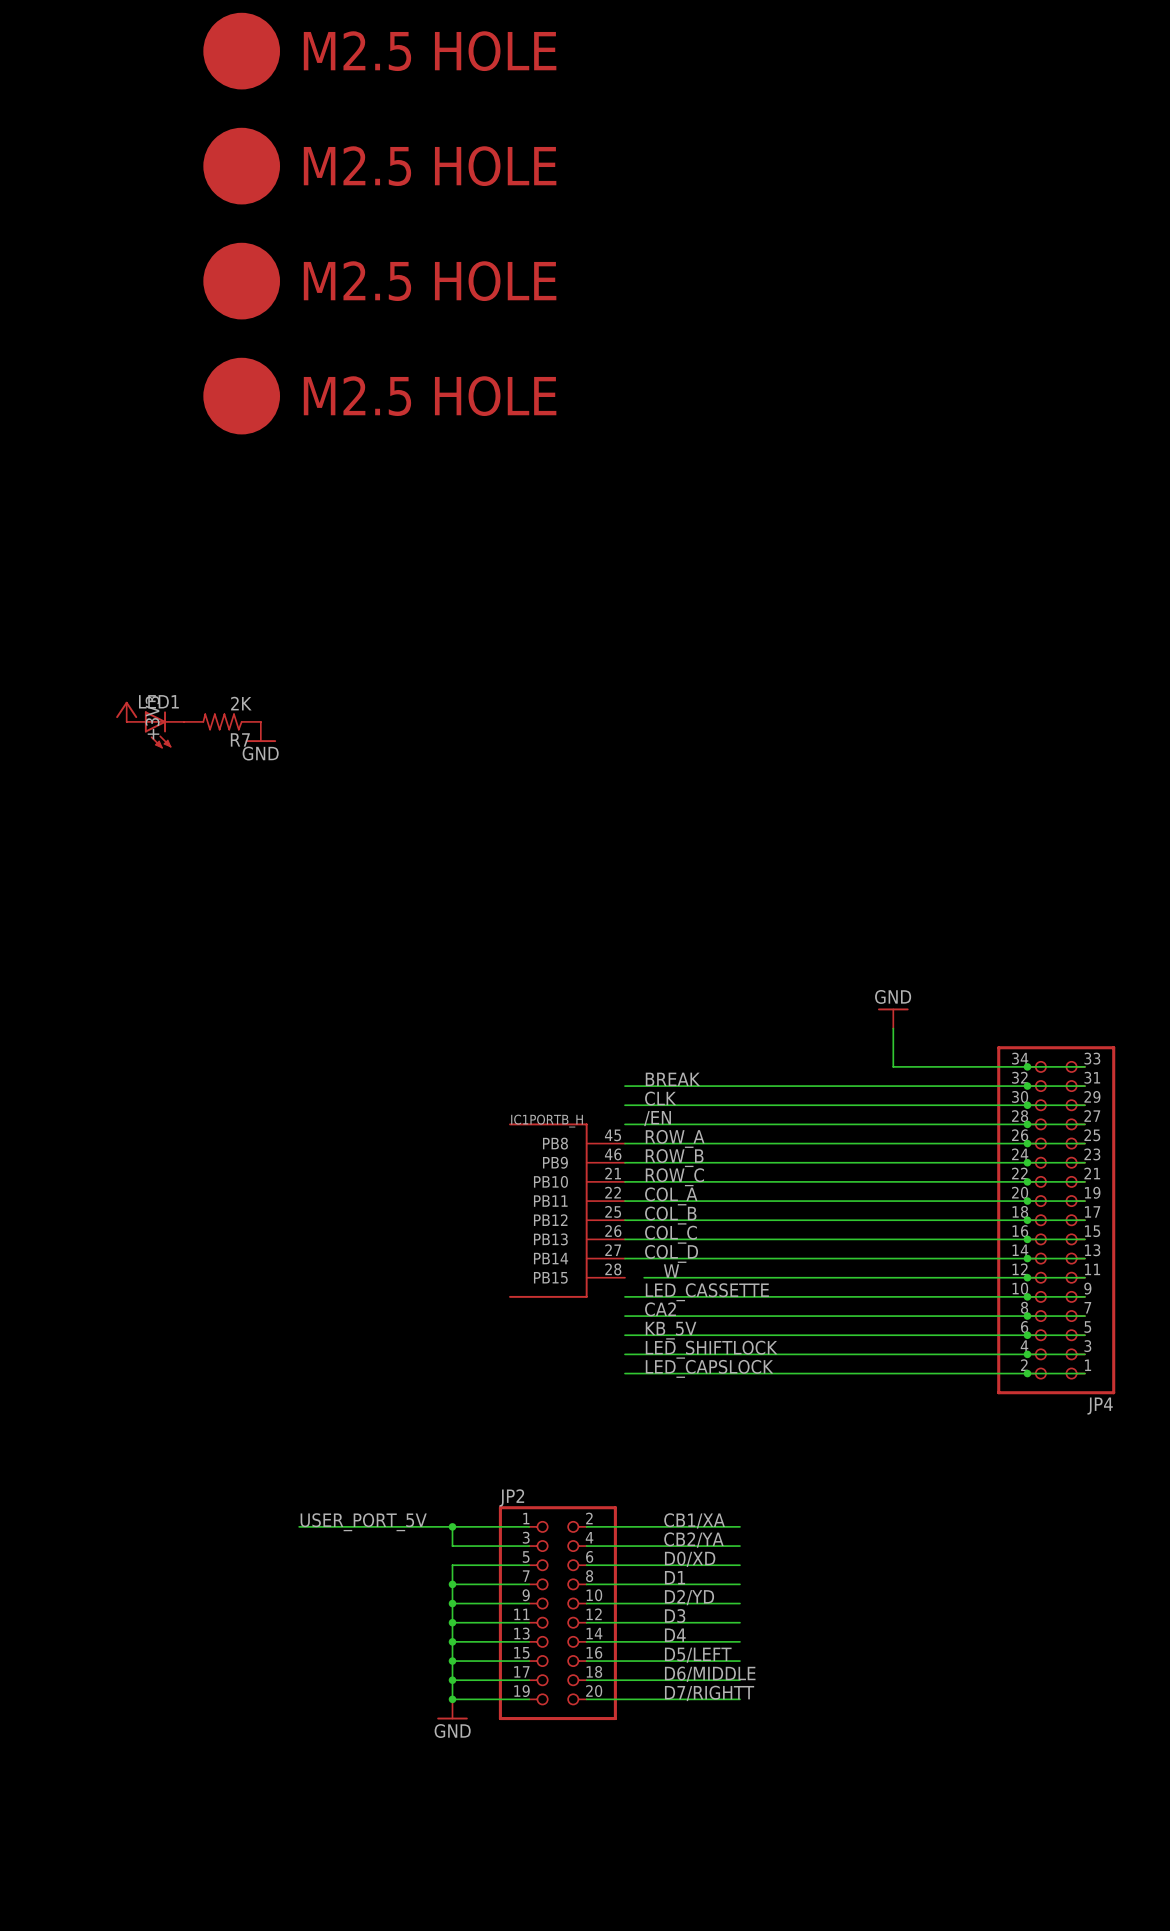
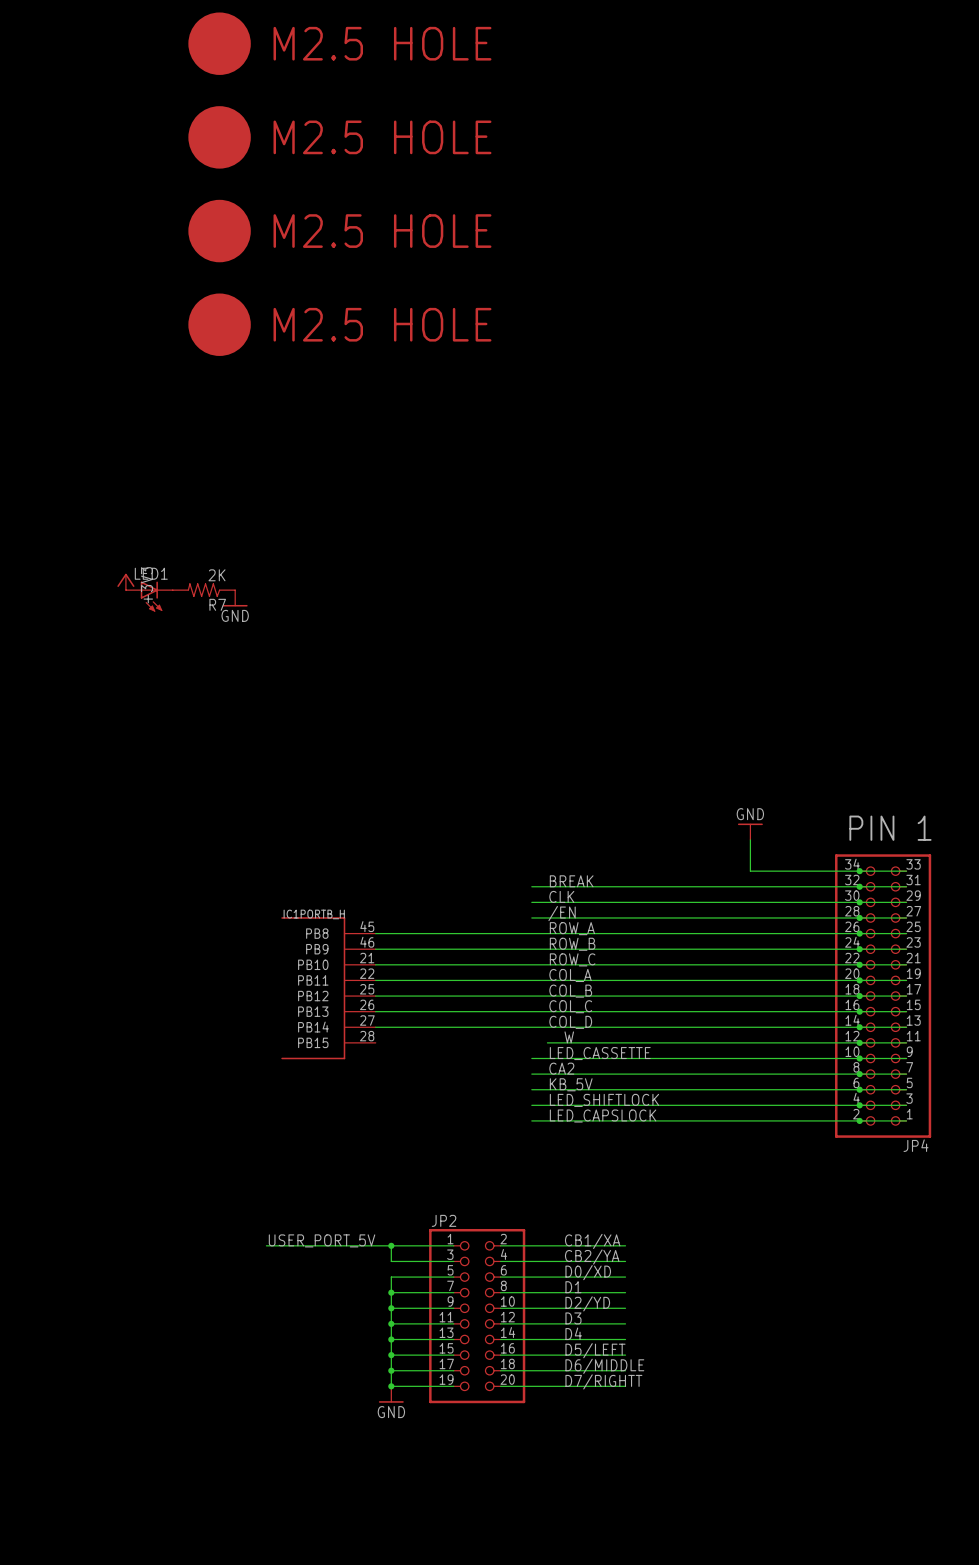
text: none -> PIN 1 (890, 828)
wire: none -> (375, 933) (531, 933)
wire: none -> (375, 949) (531, 949)
wire: none -> (375, 964) (531, 964)
wire: none -> (375, 980) (531, 980)
IC1PORTB_H position: (567, 1210) -> (328, 988)
wire: none -> (375, 996) (531, 996)
wire: none -> (375, 1011) (531, 1011)
wire: none -> (375, 1027) (531, 1027)

